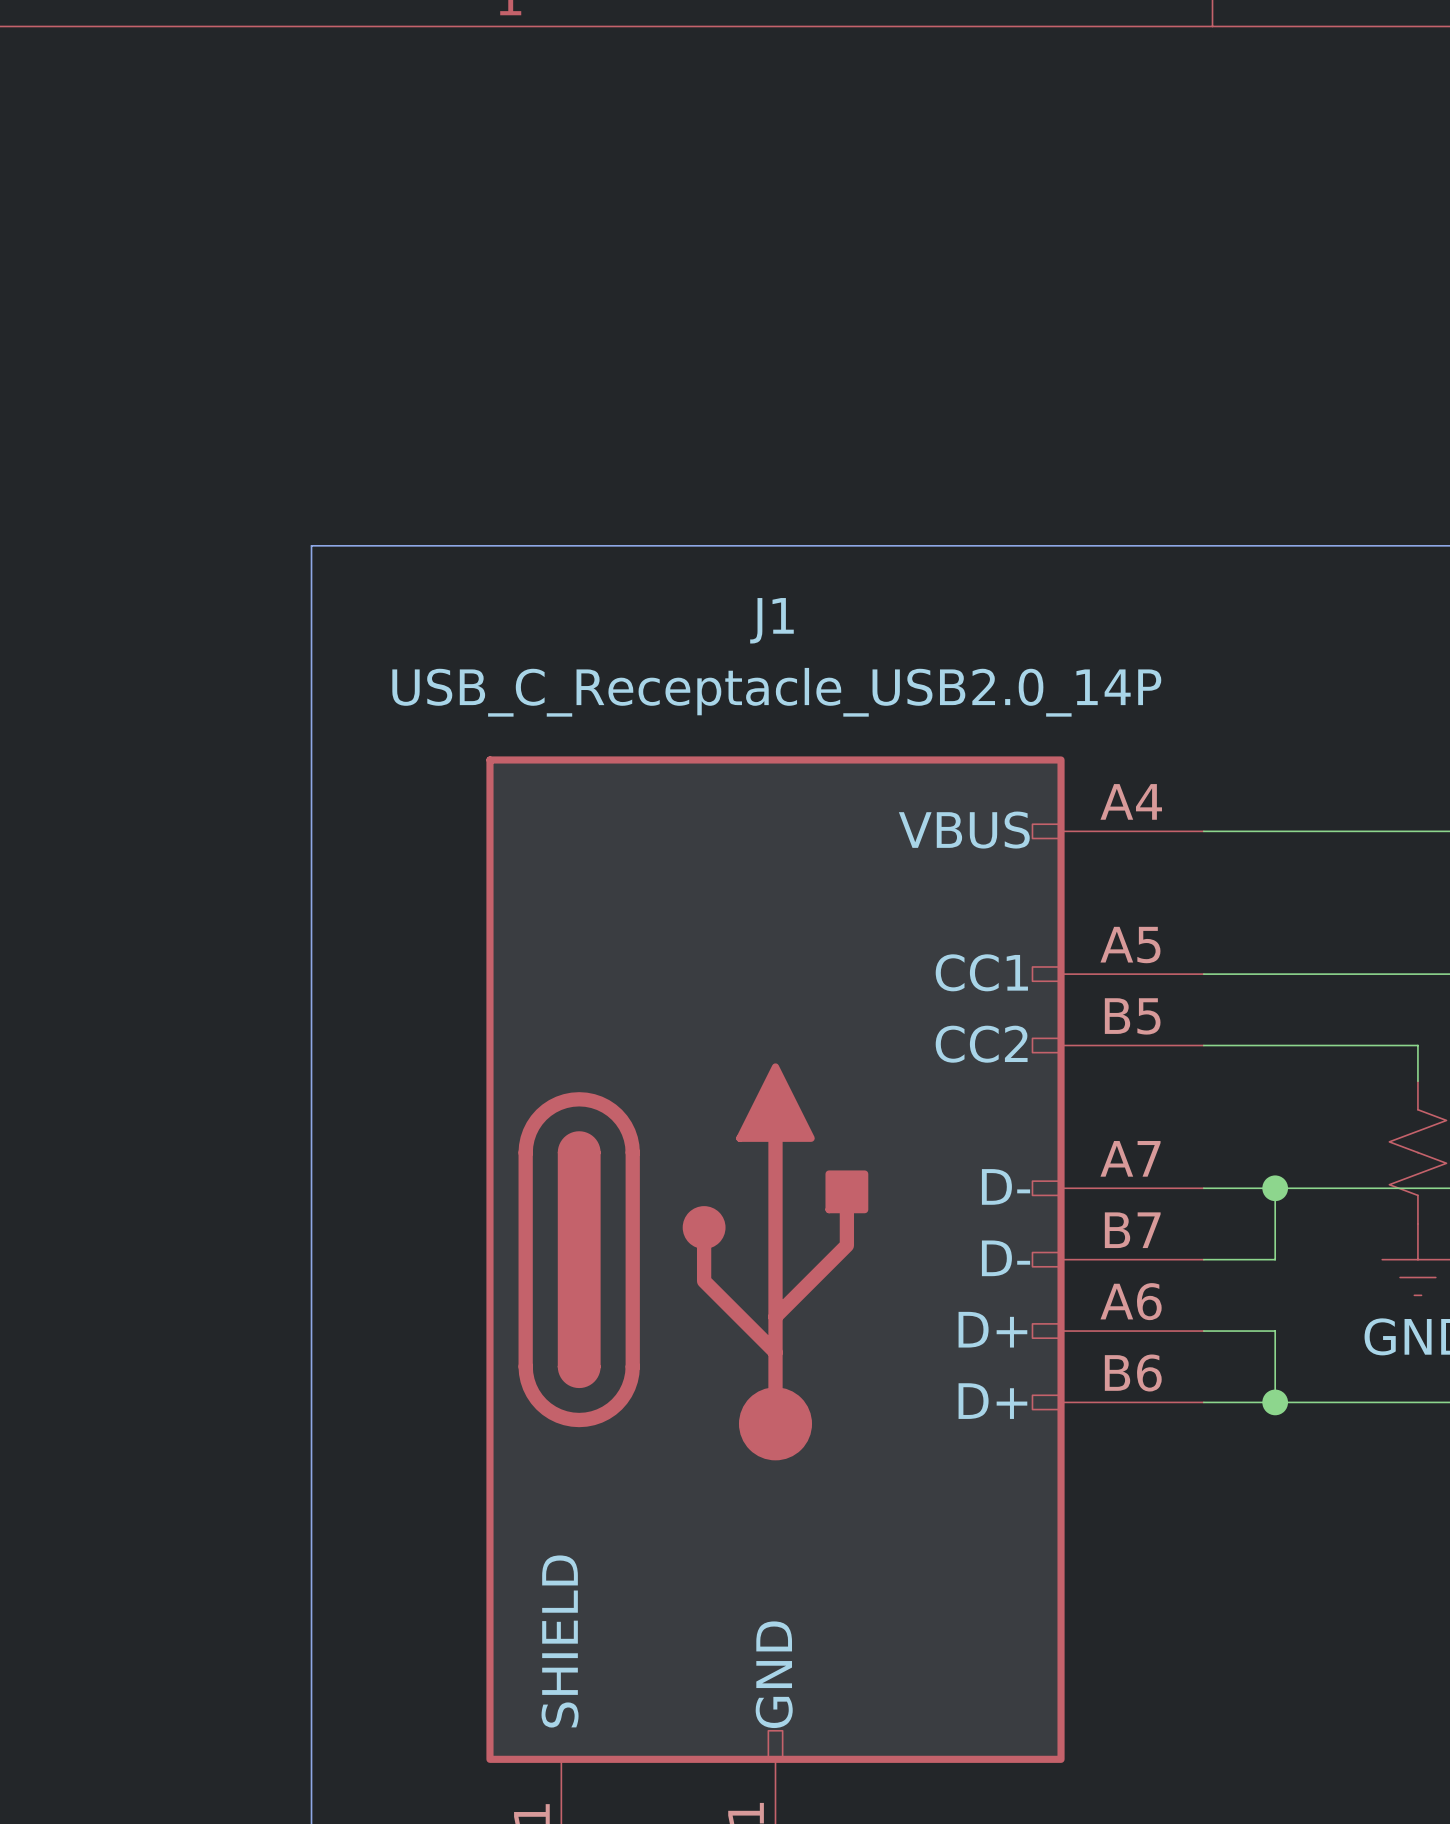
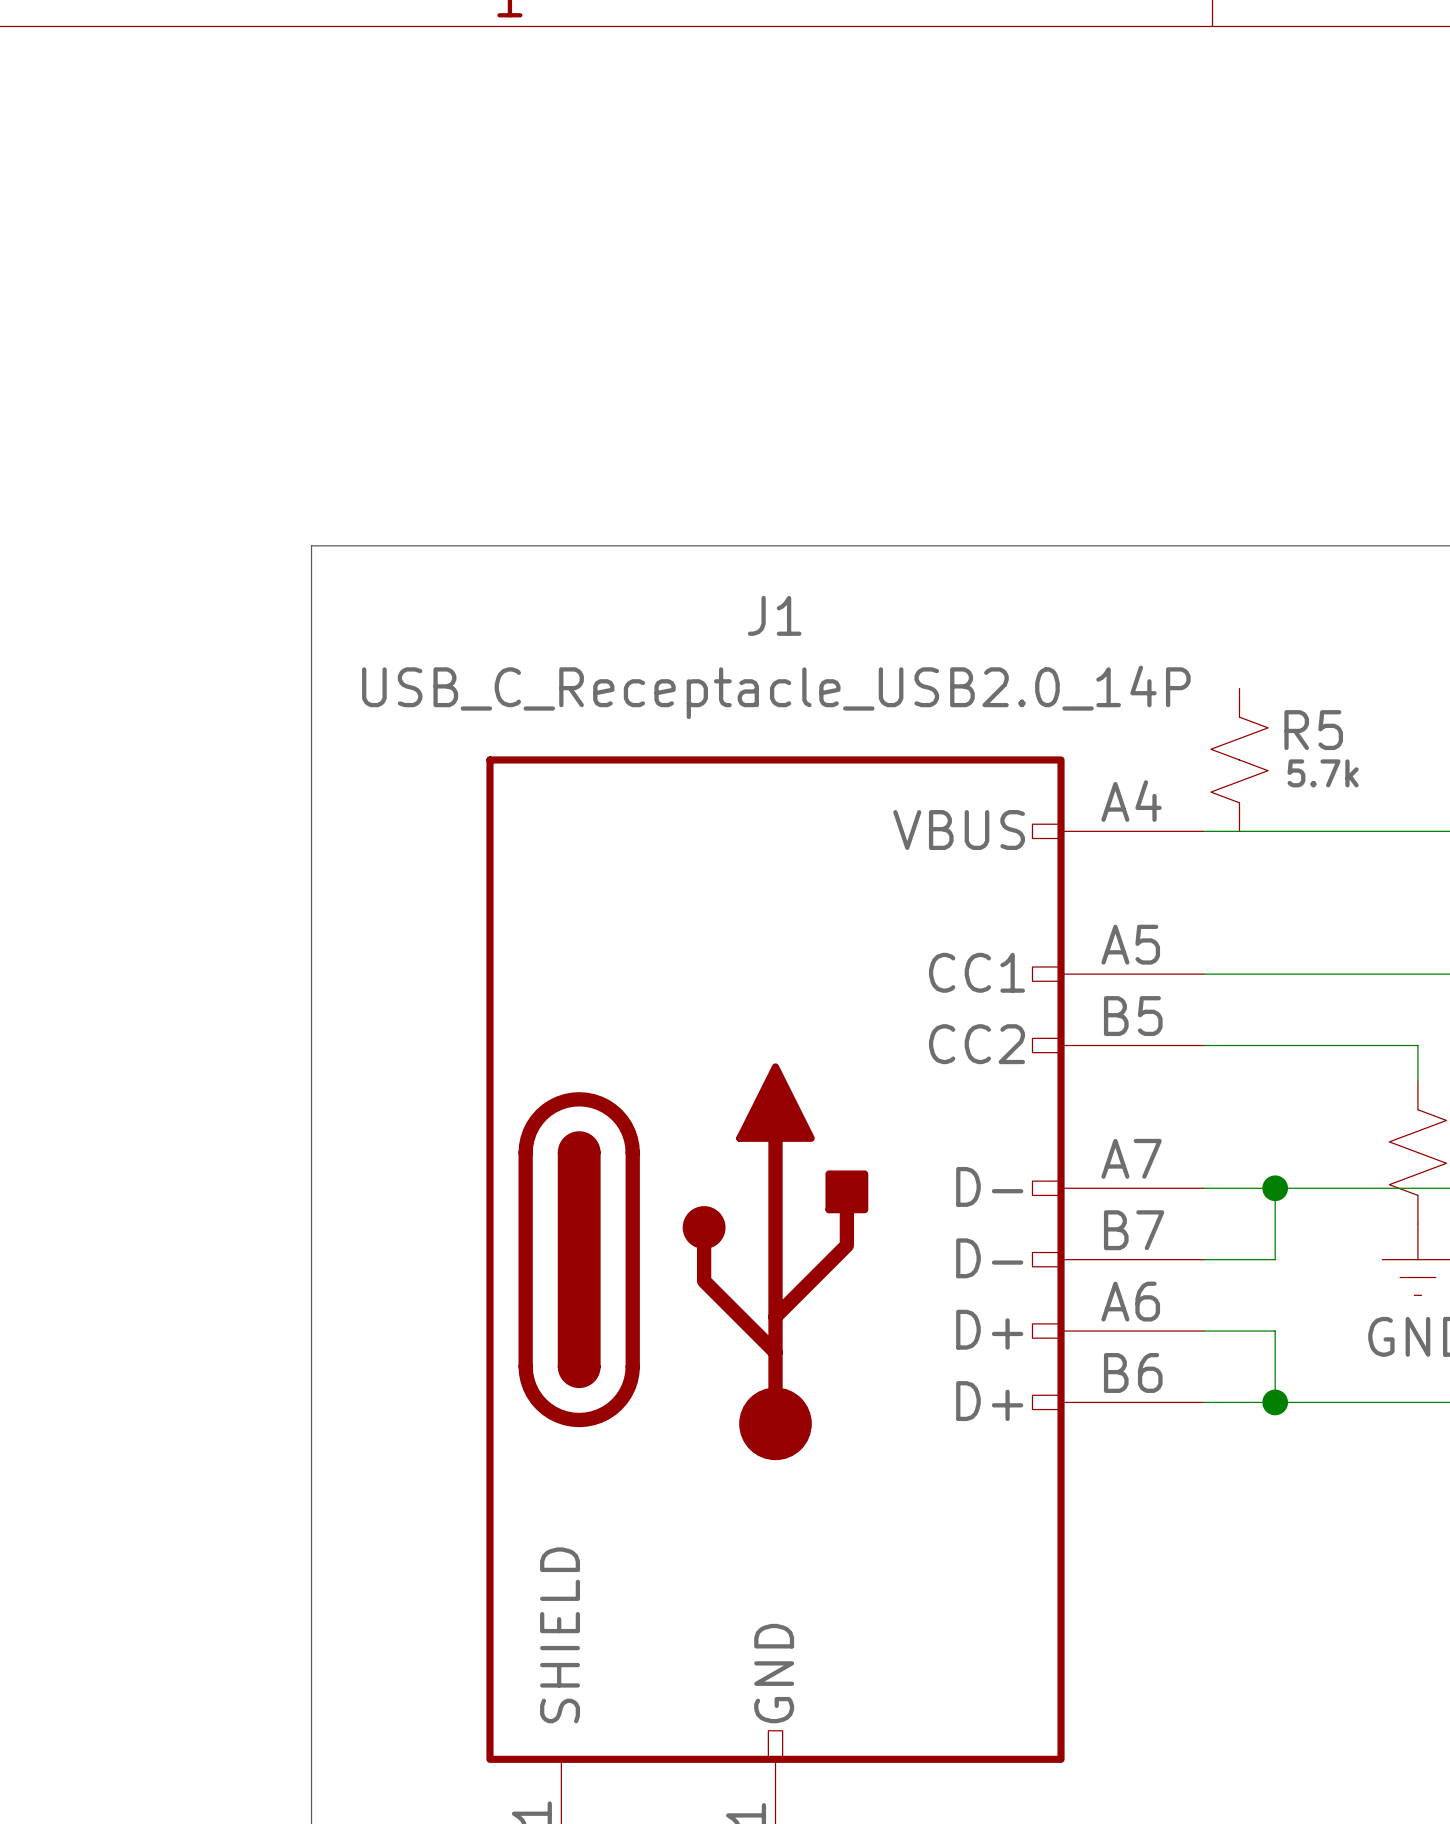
R5: none -> 5.7k (1239, 759)

